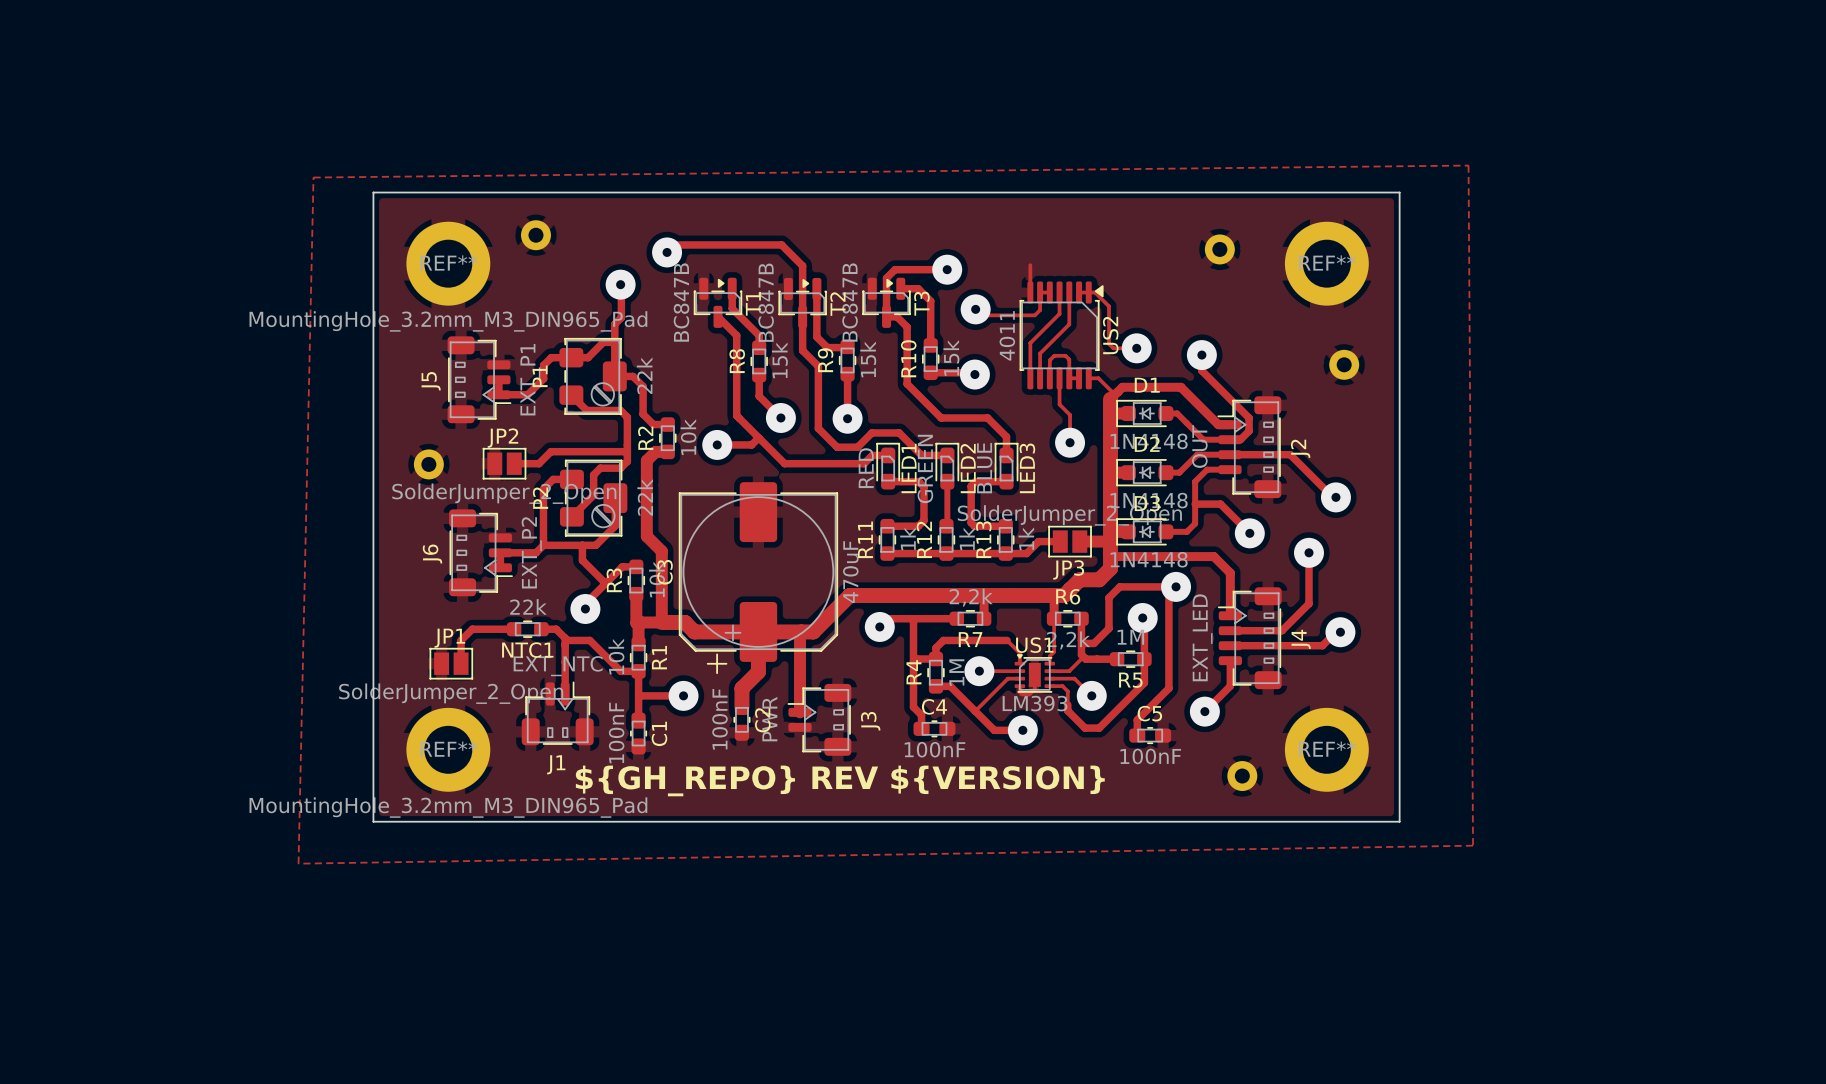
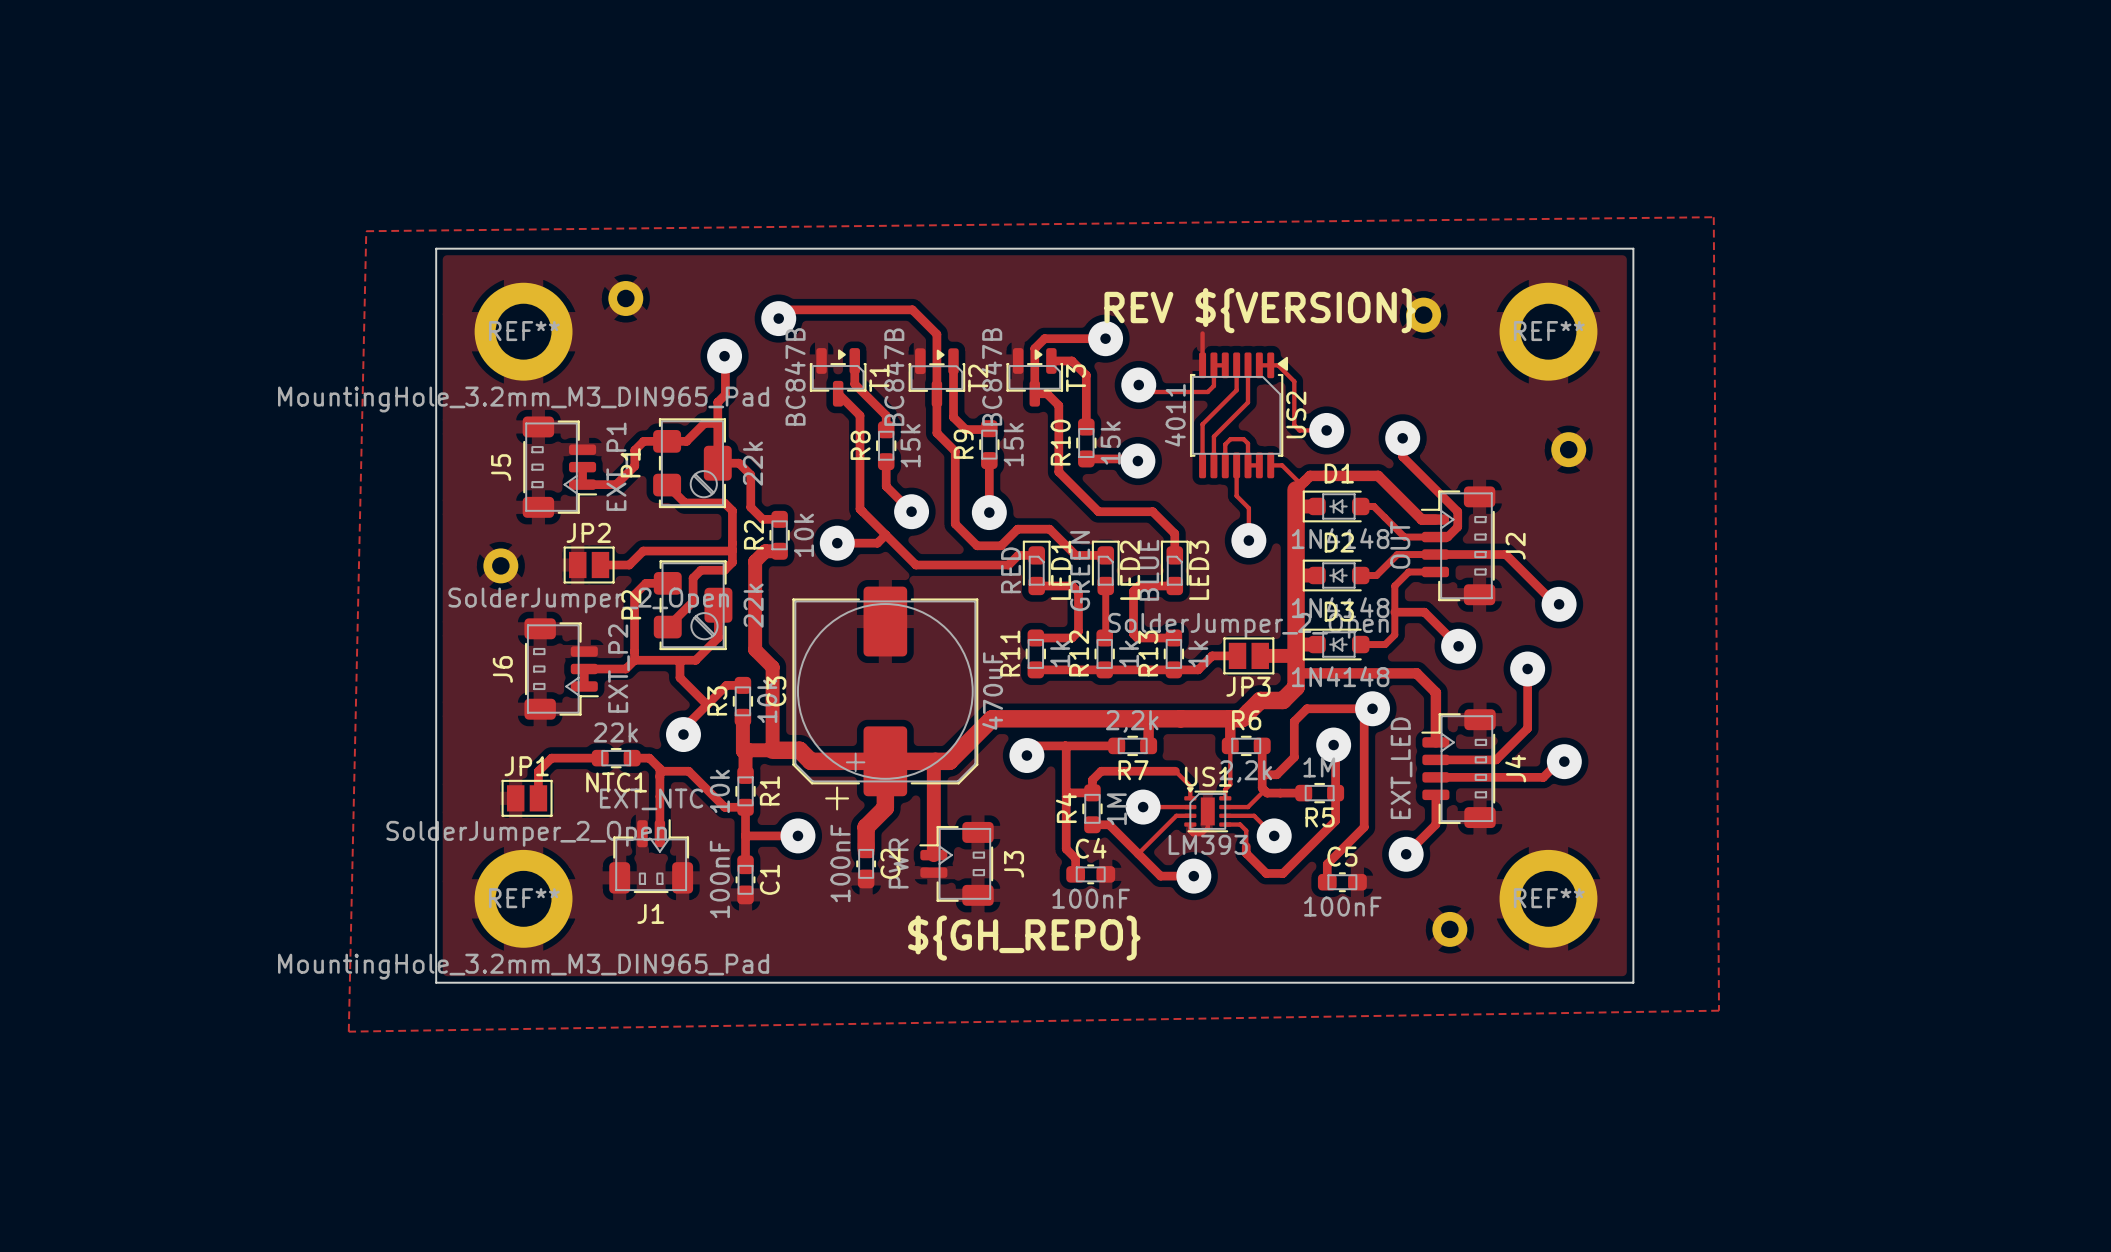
text: none -> REV ${VERSION} (1259, 310)
text: ${GH_REPO} REV ${VERSION} (840, 780) -> none
text: none -> ${GH_REPO} (1024, 938)

